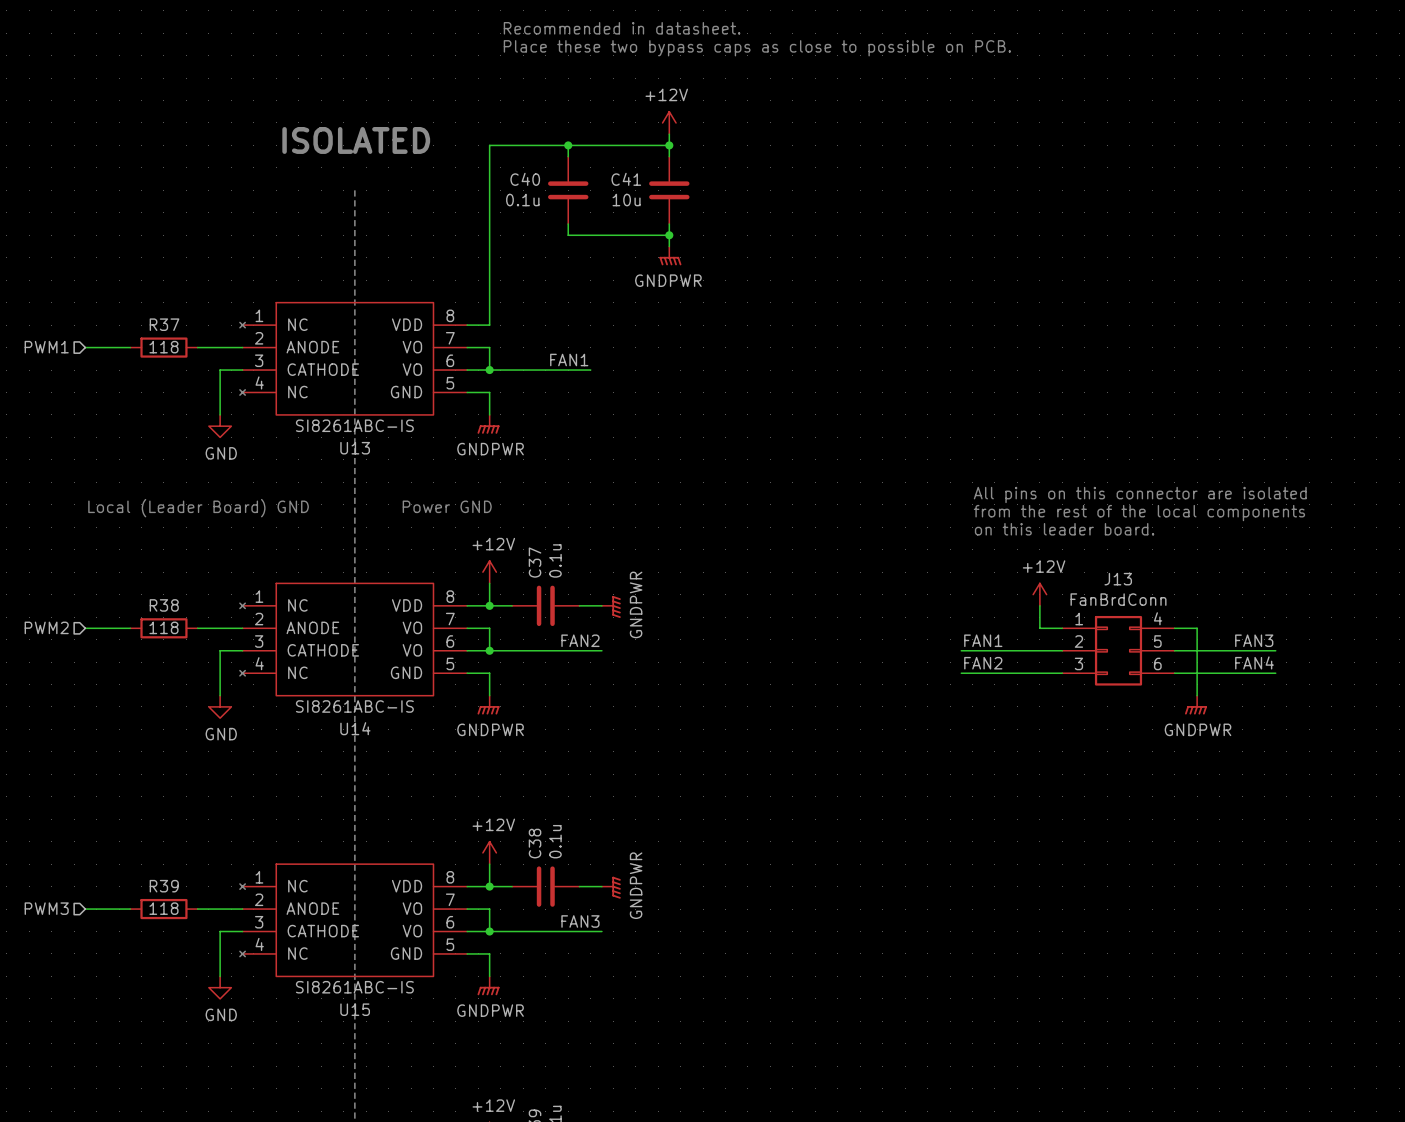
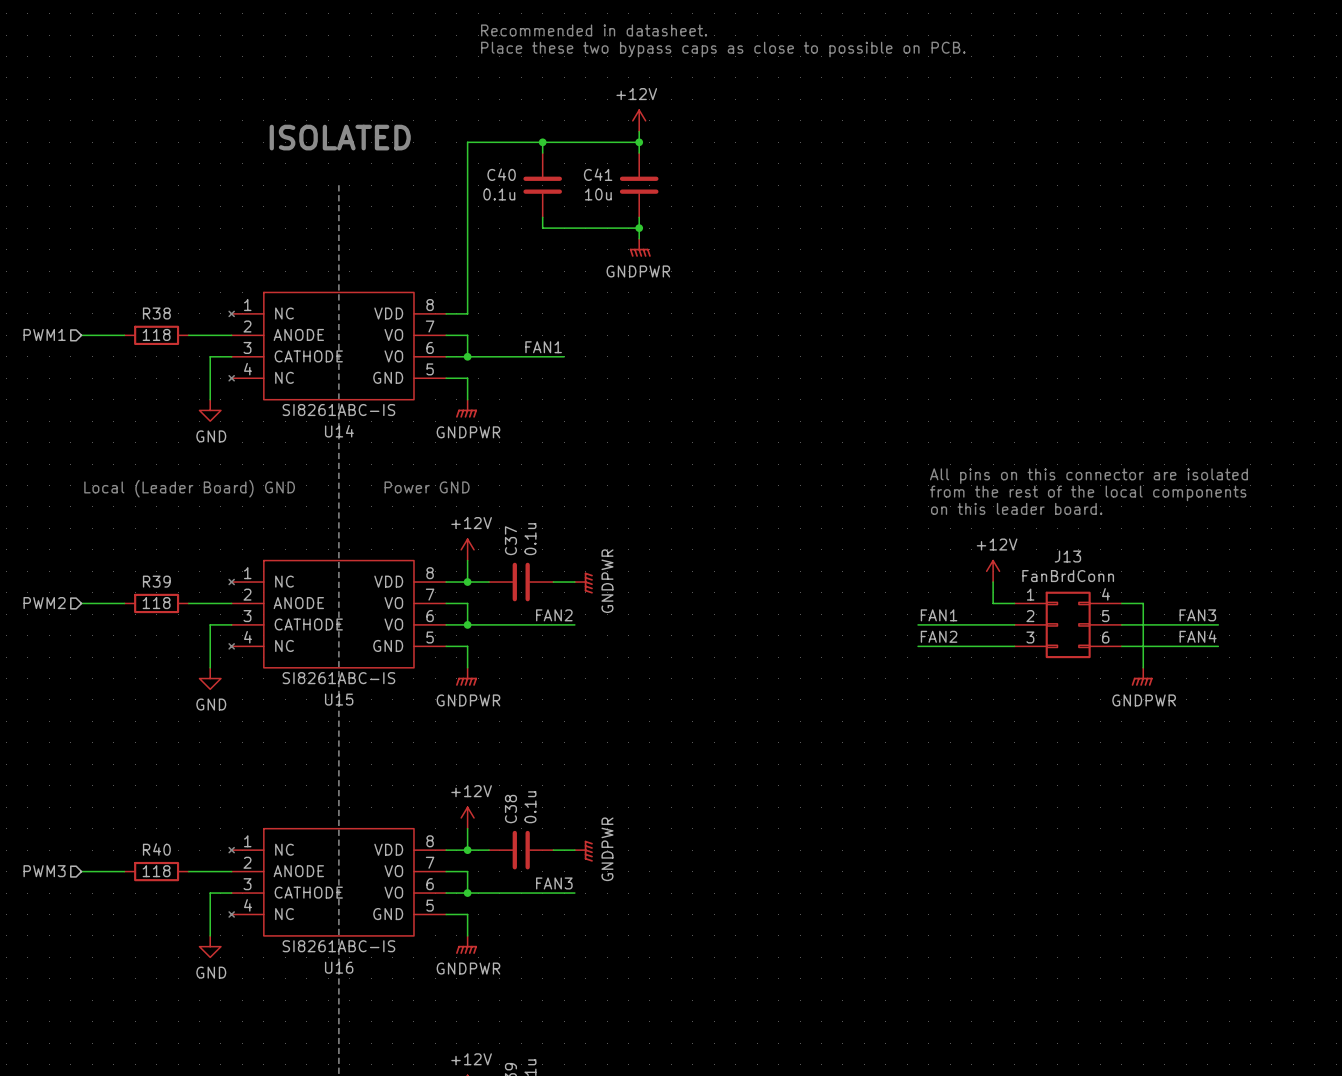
R37 name: R37 (164, 324) -> R38 (156, 313)
U13 name: U13 (355, 448) -> U14 (339, 431)
R38 name: R38 (164, 605) -> R39 (156, 581)
U14 name: U14 (355, 728) -> U15 (339, 699)
R39 name: R39 (164, 886) -> R40 (156, 849)
U15 name: U15 (355, 1009) -> U16 (339, 967)

